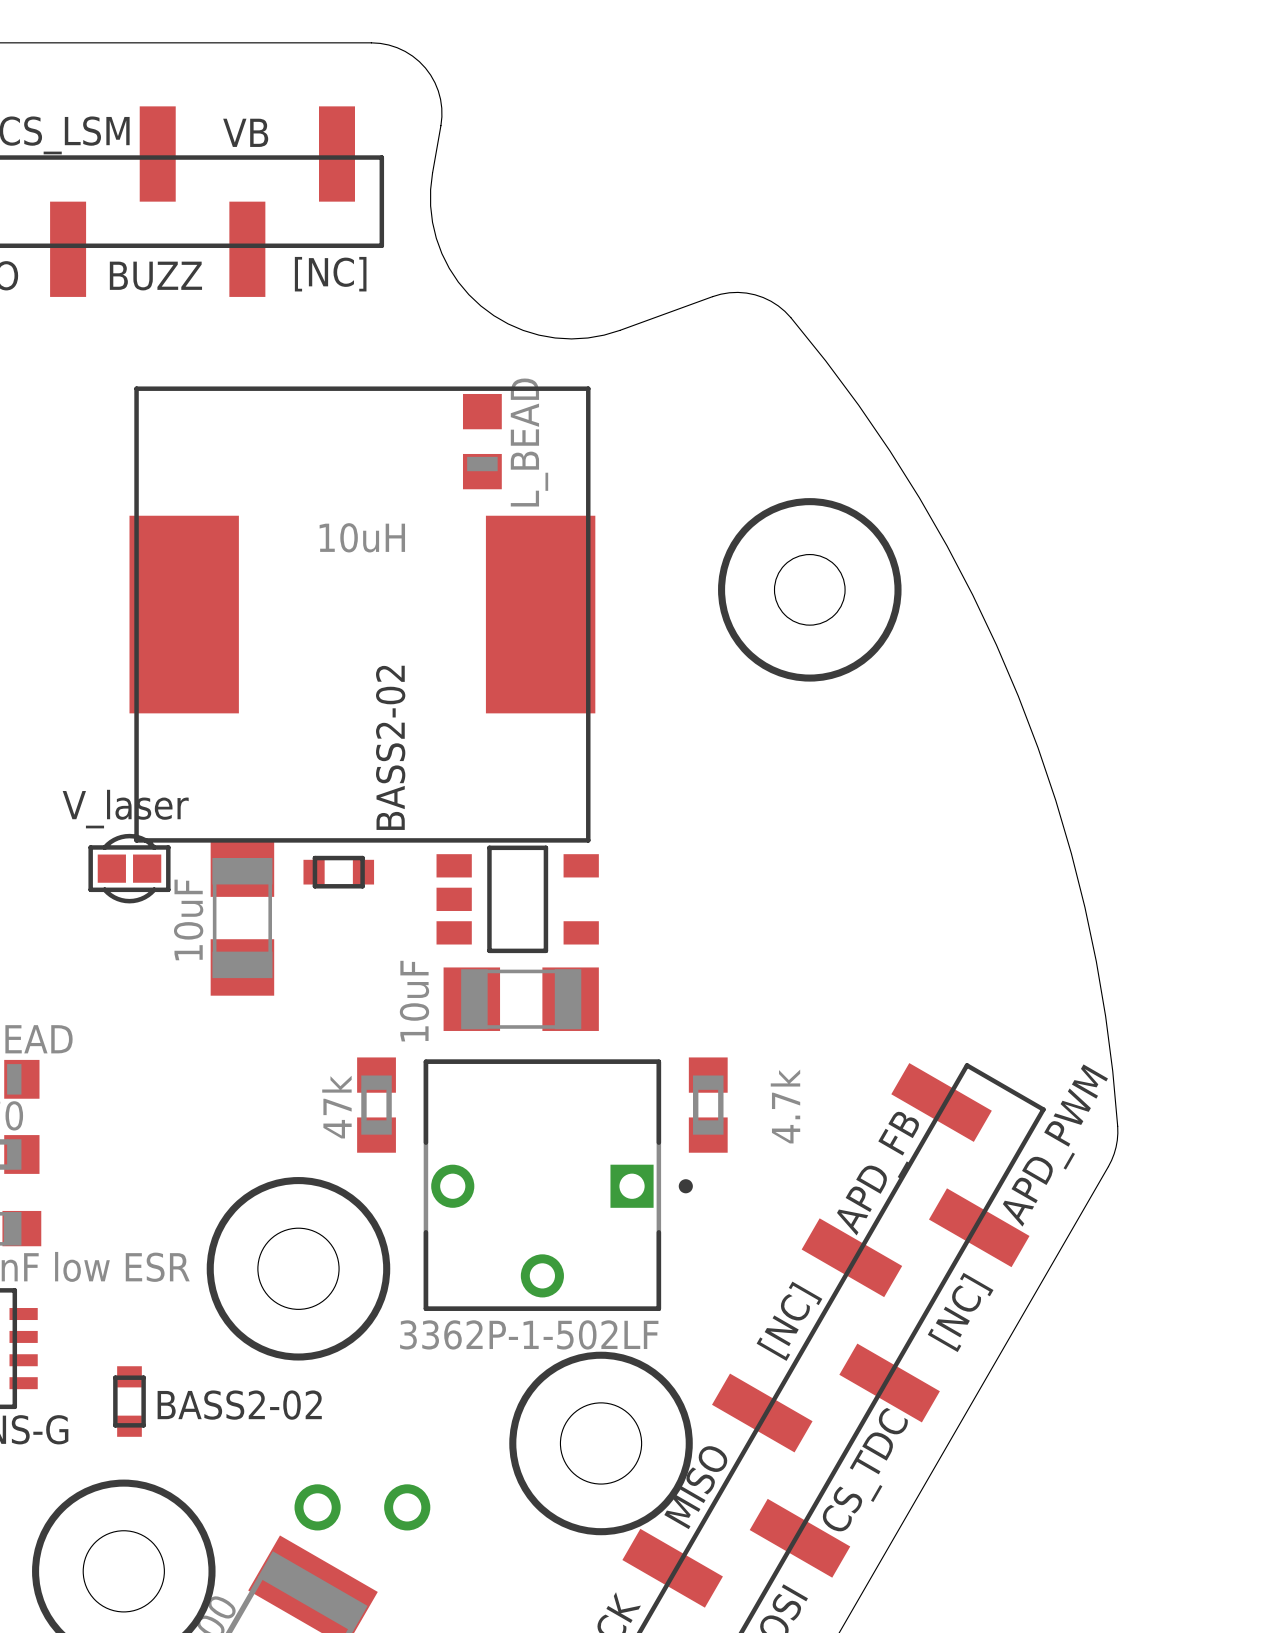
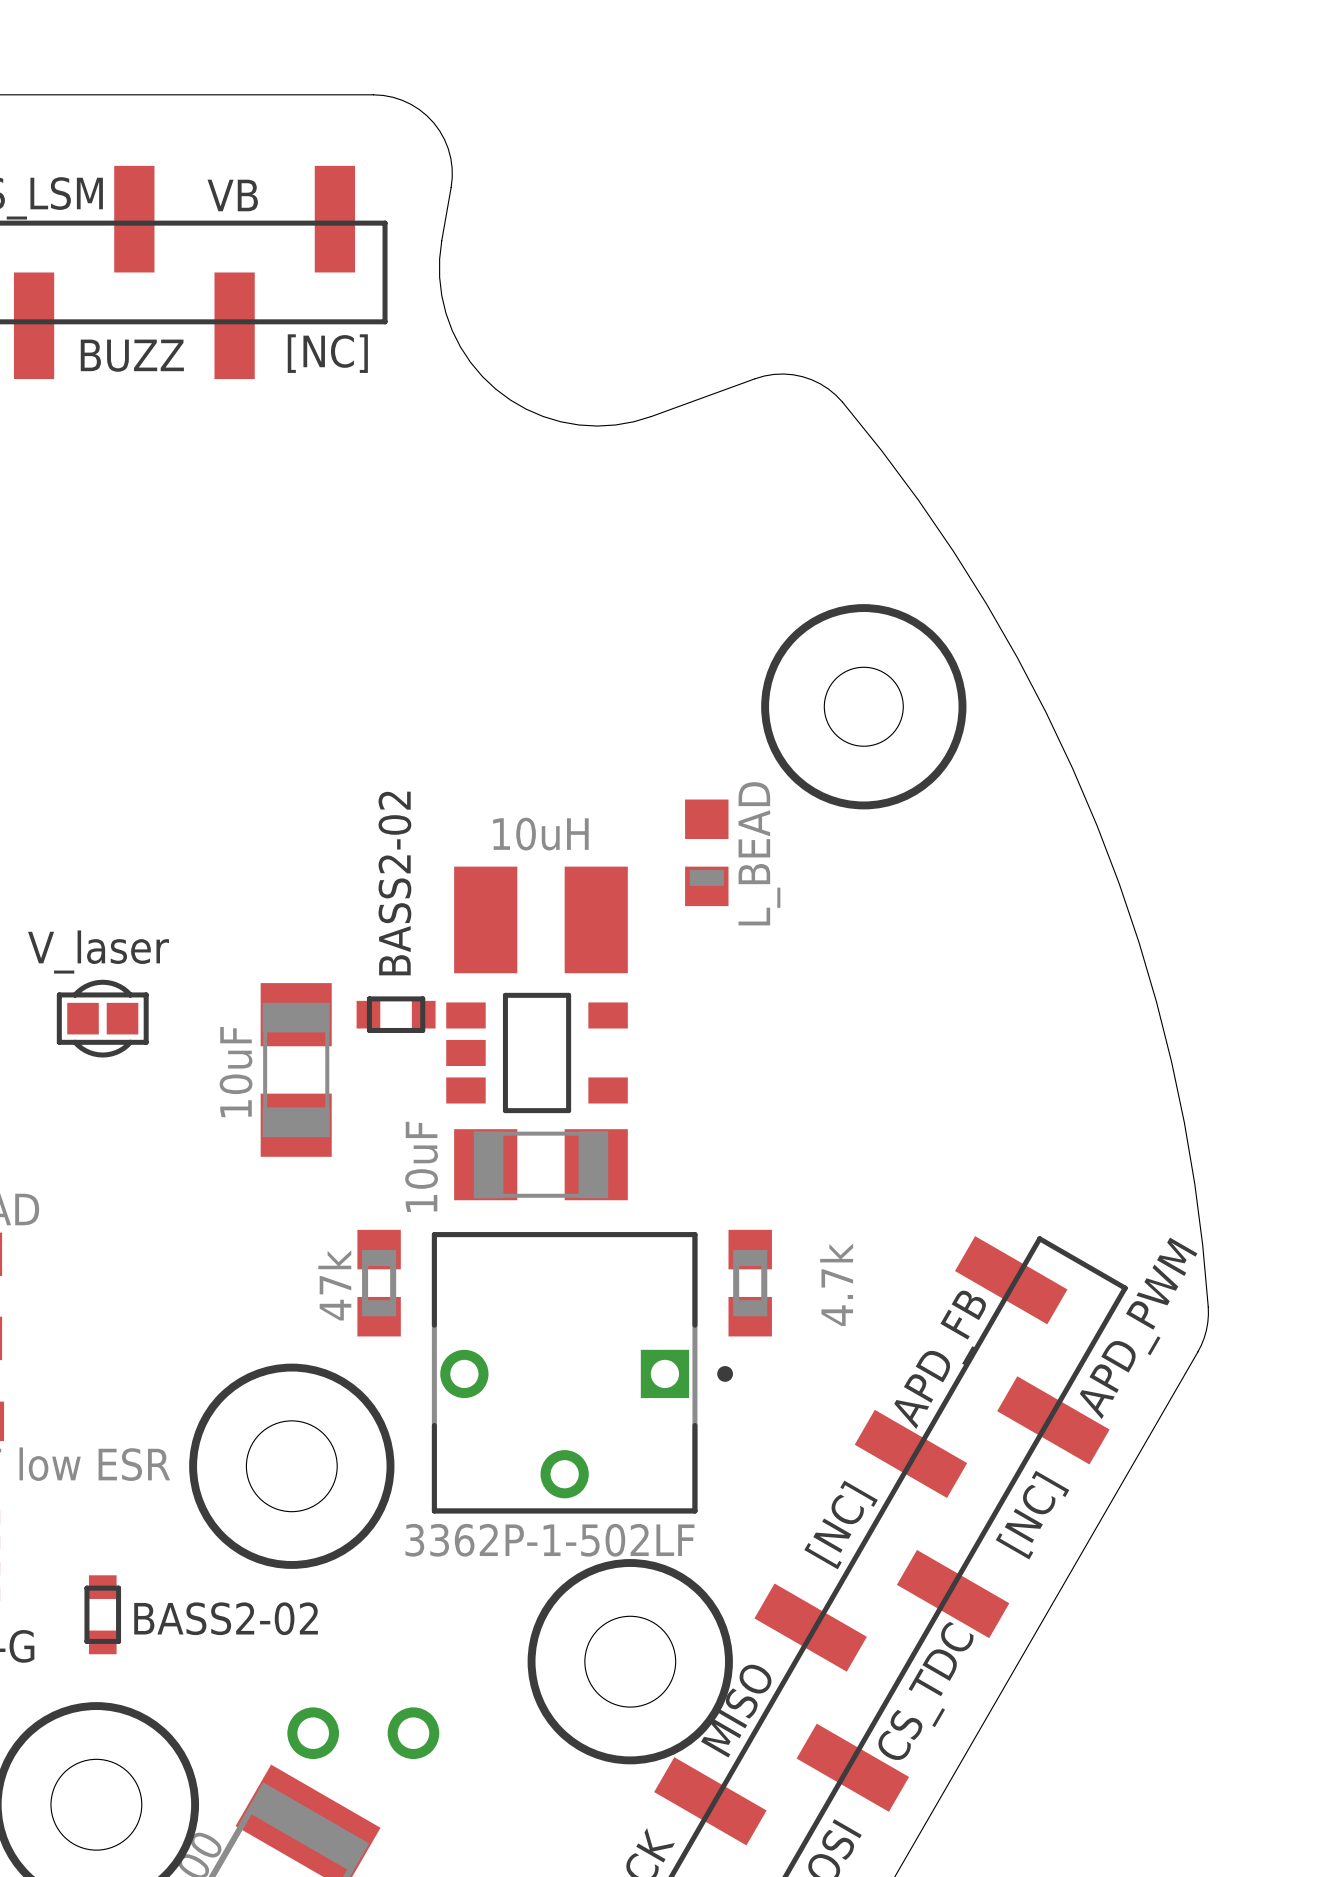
part position: (482, 441) -> (706, 852)
part: 10uH (362, 614) -> none
part: none -> 10uH (540, 919)
part position: (338, 872) -> (396, 1014)
part position: (242, 918) -> (296, 1069)

